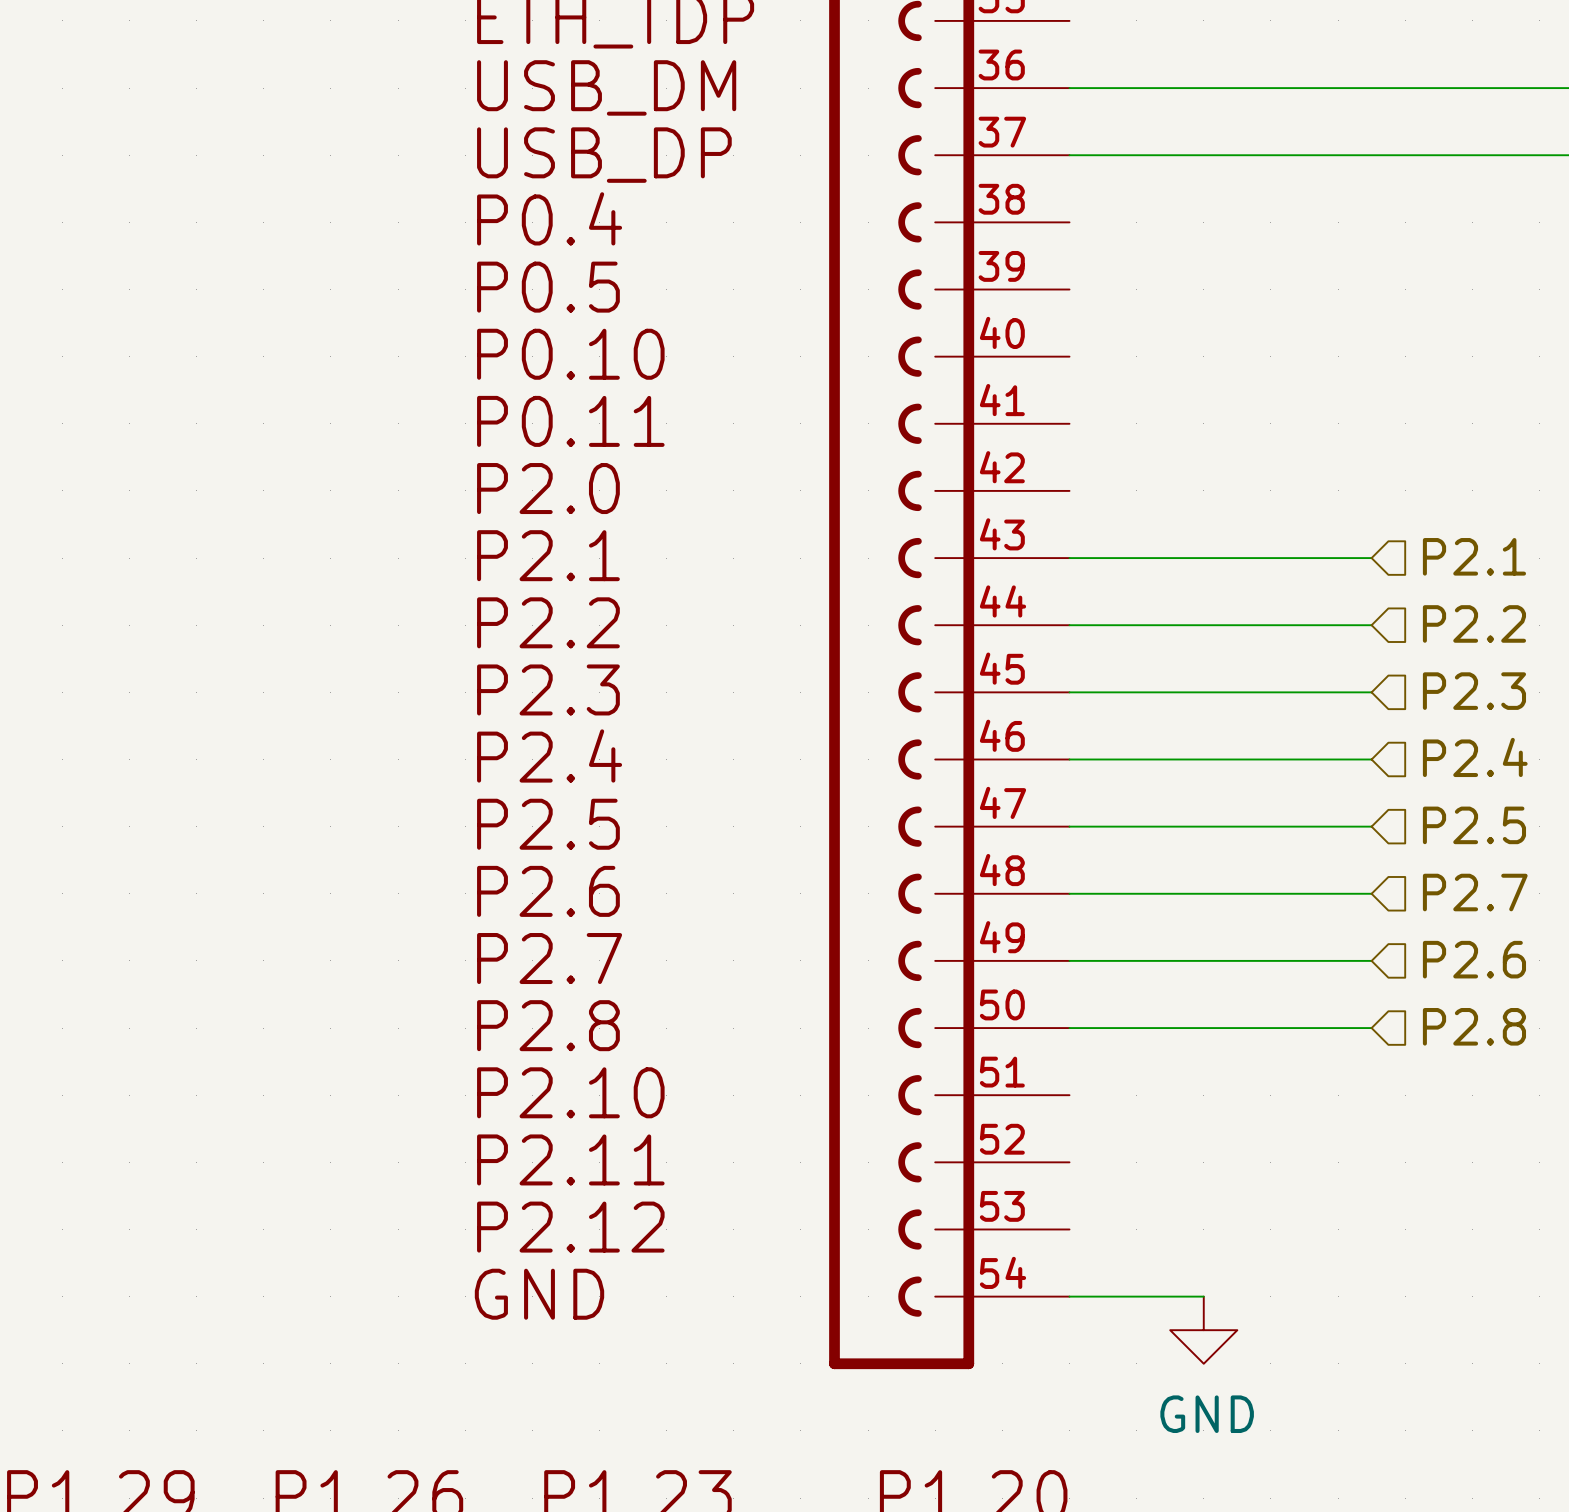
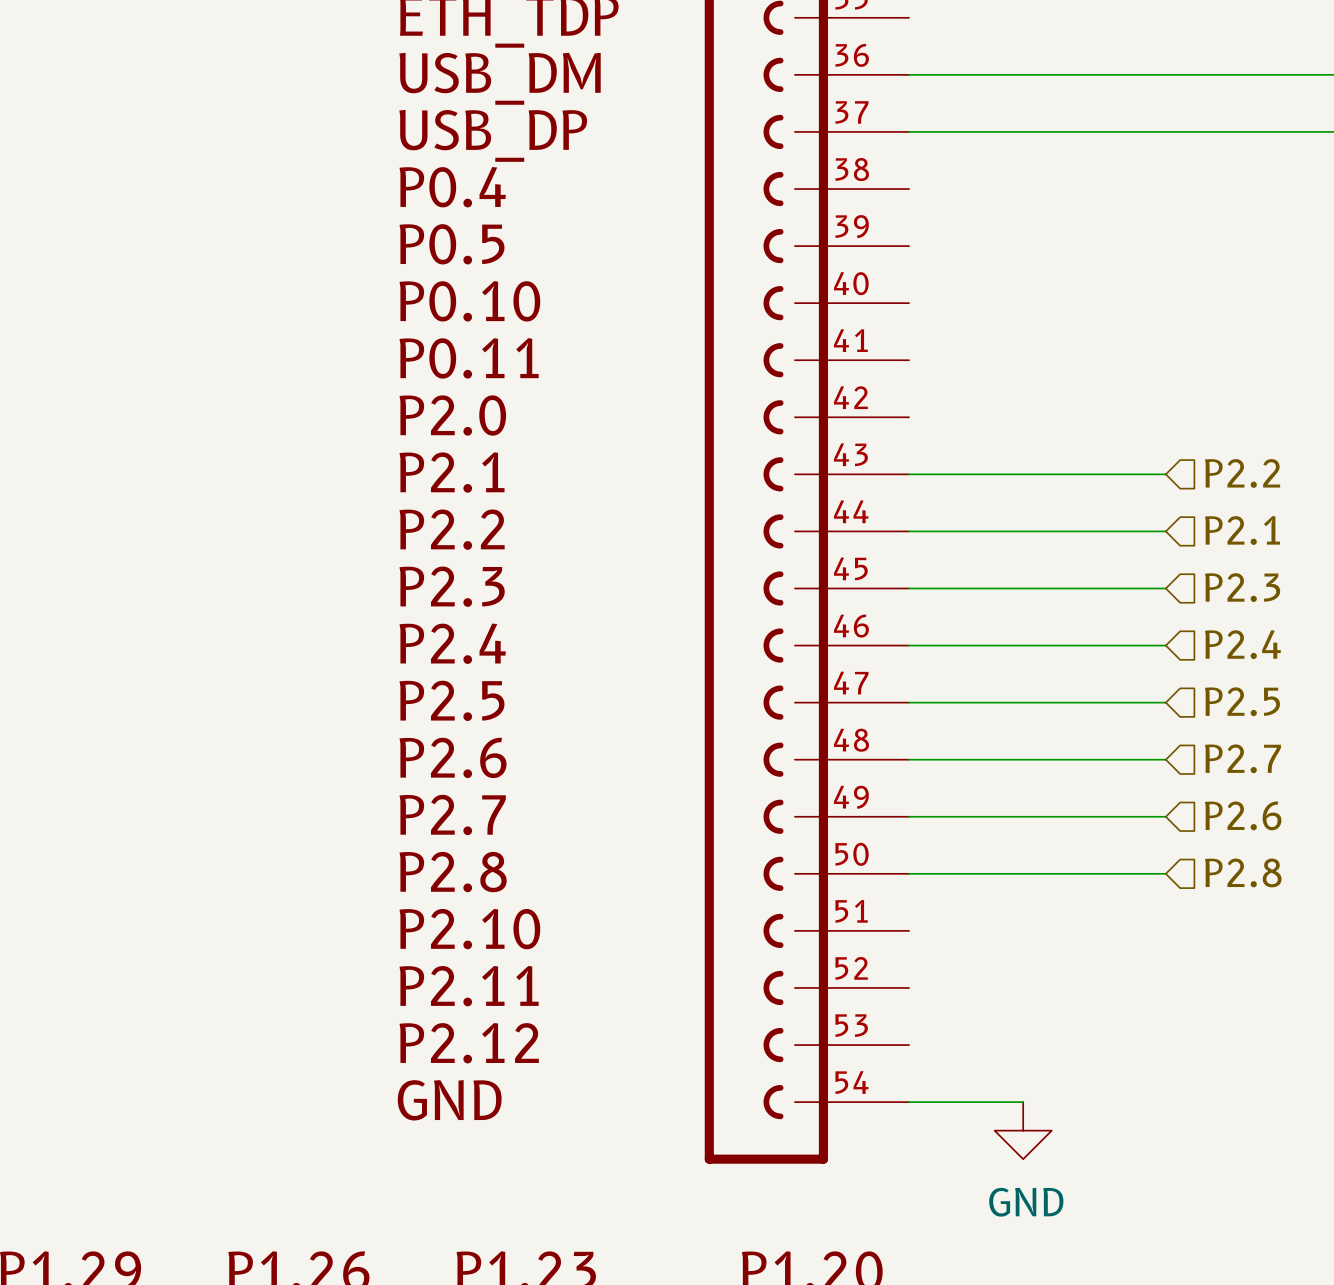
hierarchical label: P2.1 (1474, 556) -> P2.2 (1242, 473)
hierarchical label: P2.2 (1474, 623) -> P2.1 (1242, 530)

